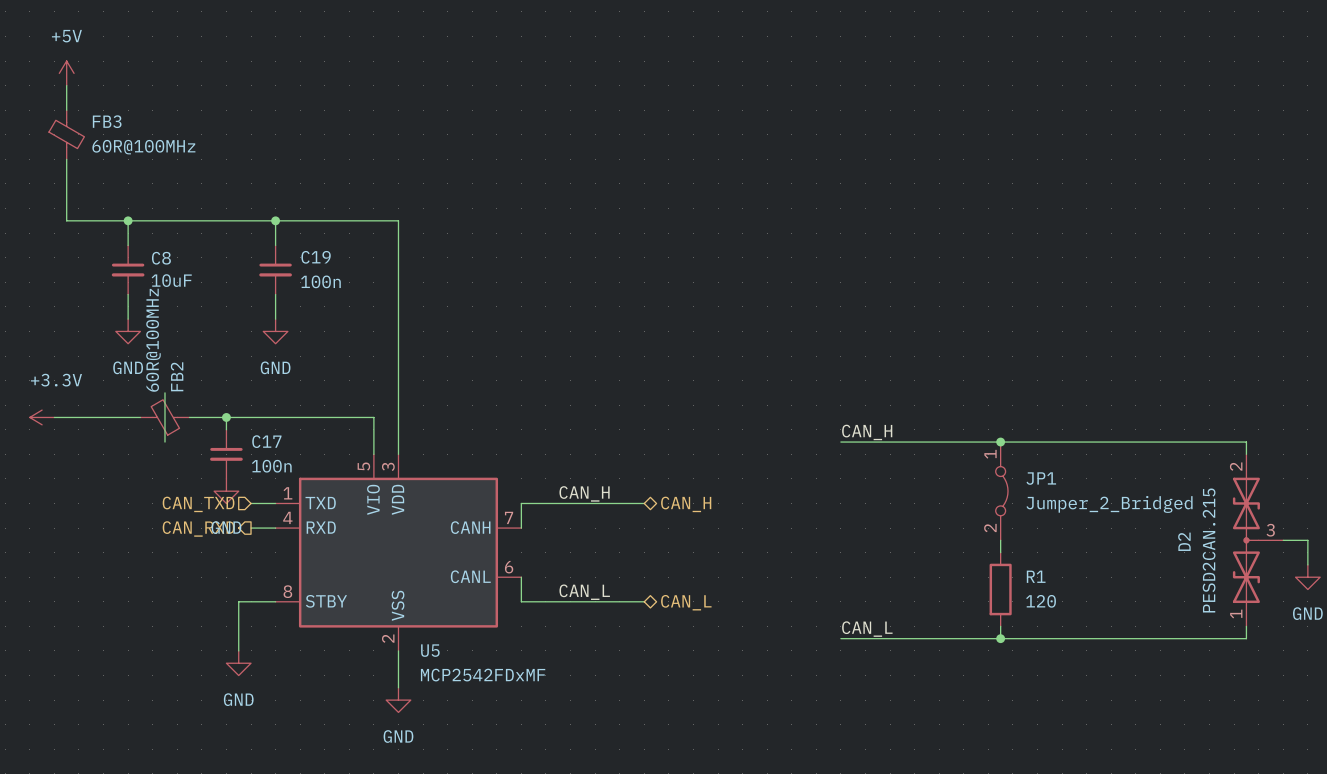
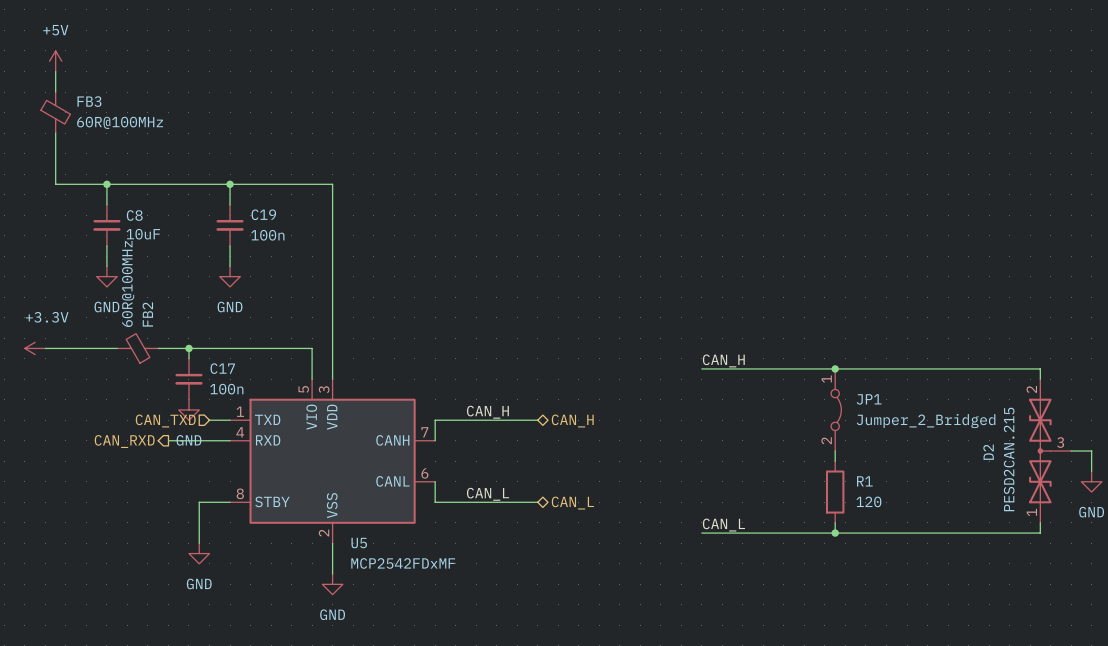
wire: (164, 392) (164, 442) -> none
hierarchical label position: CAN_RXD (198, 528) -> CAN_RXD (124, 441)
wire: none -> (168, 440) (209, 440)

